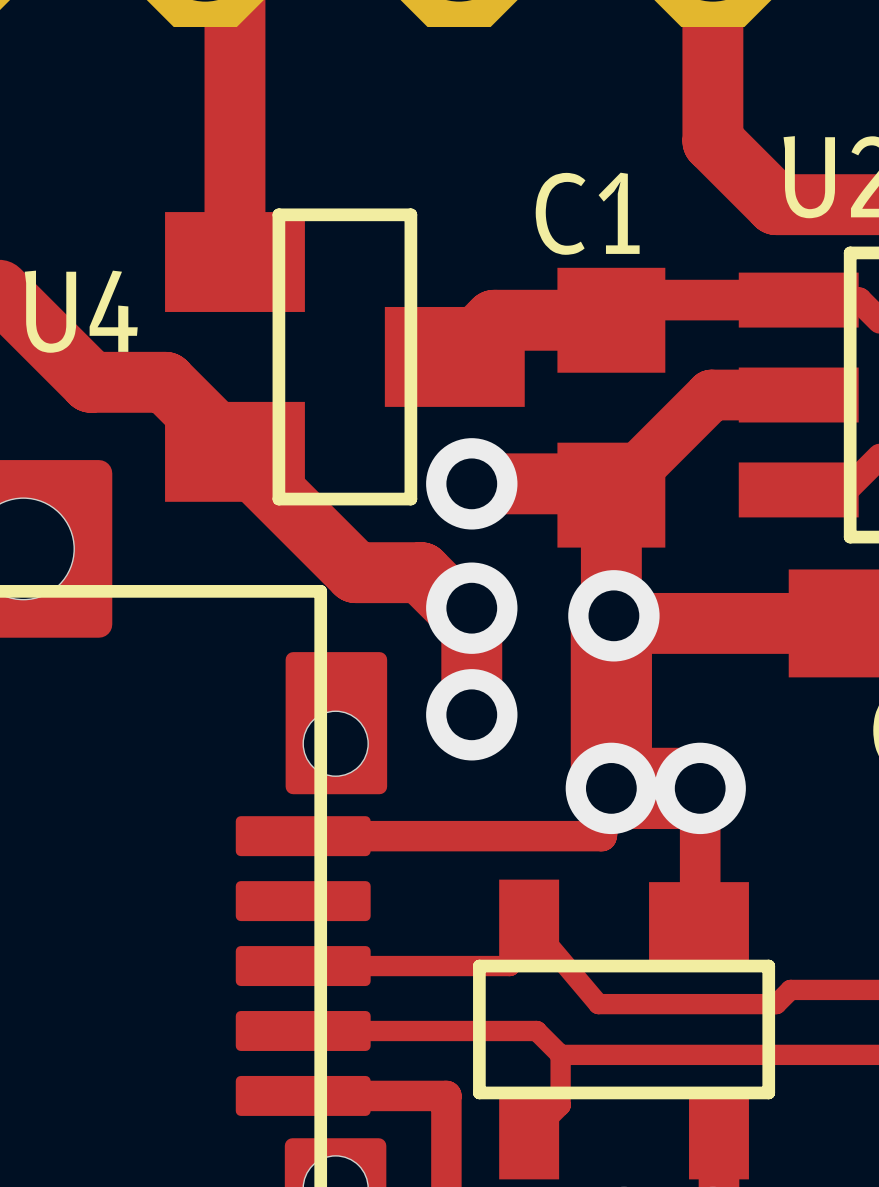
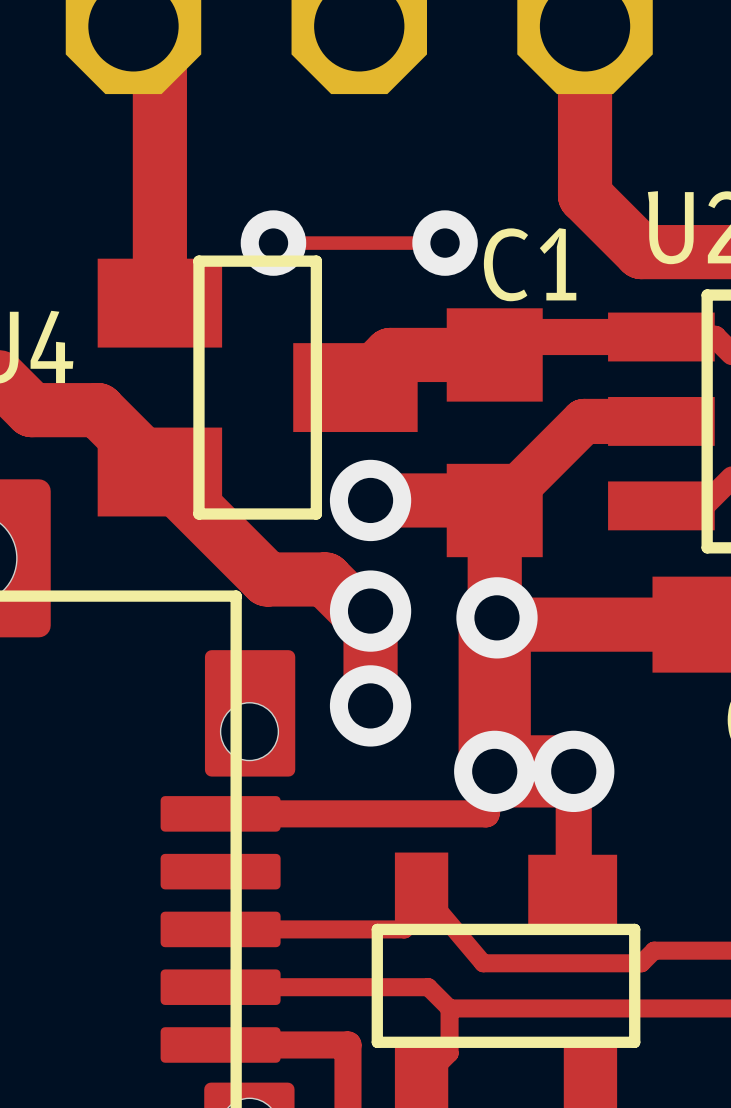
track: none -> (273, 243) (445, 243)
via: none -> (273, 243)
via: none -> (445, 243)
C1 name position: C1 (587, 213) -> C1 (530, 264)

